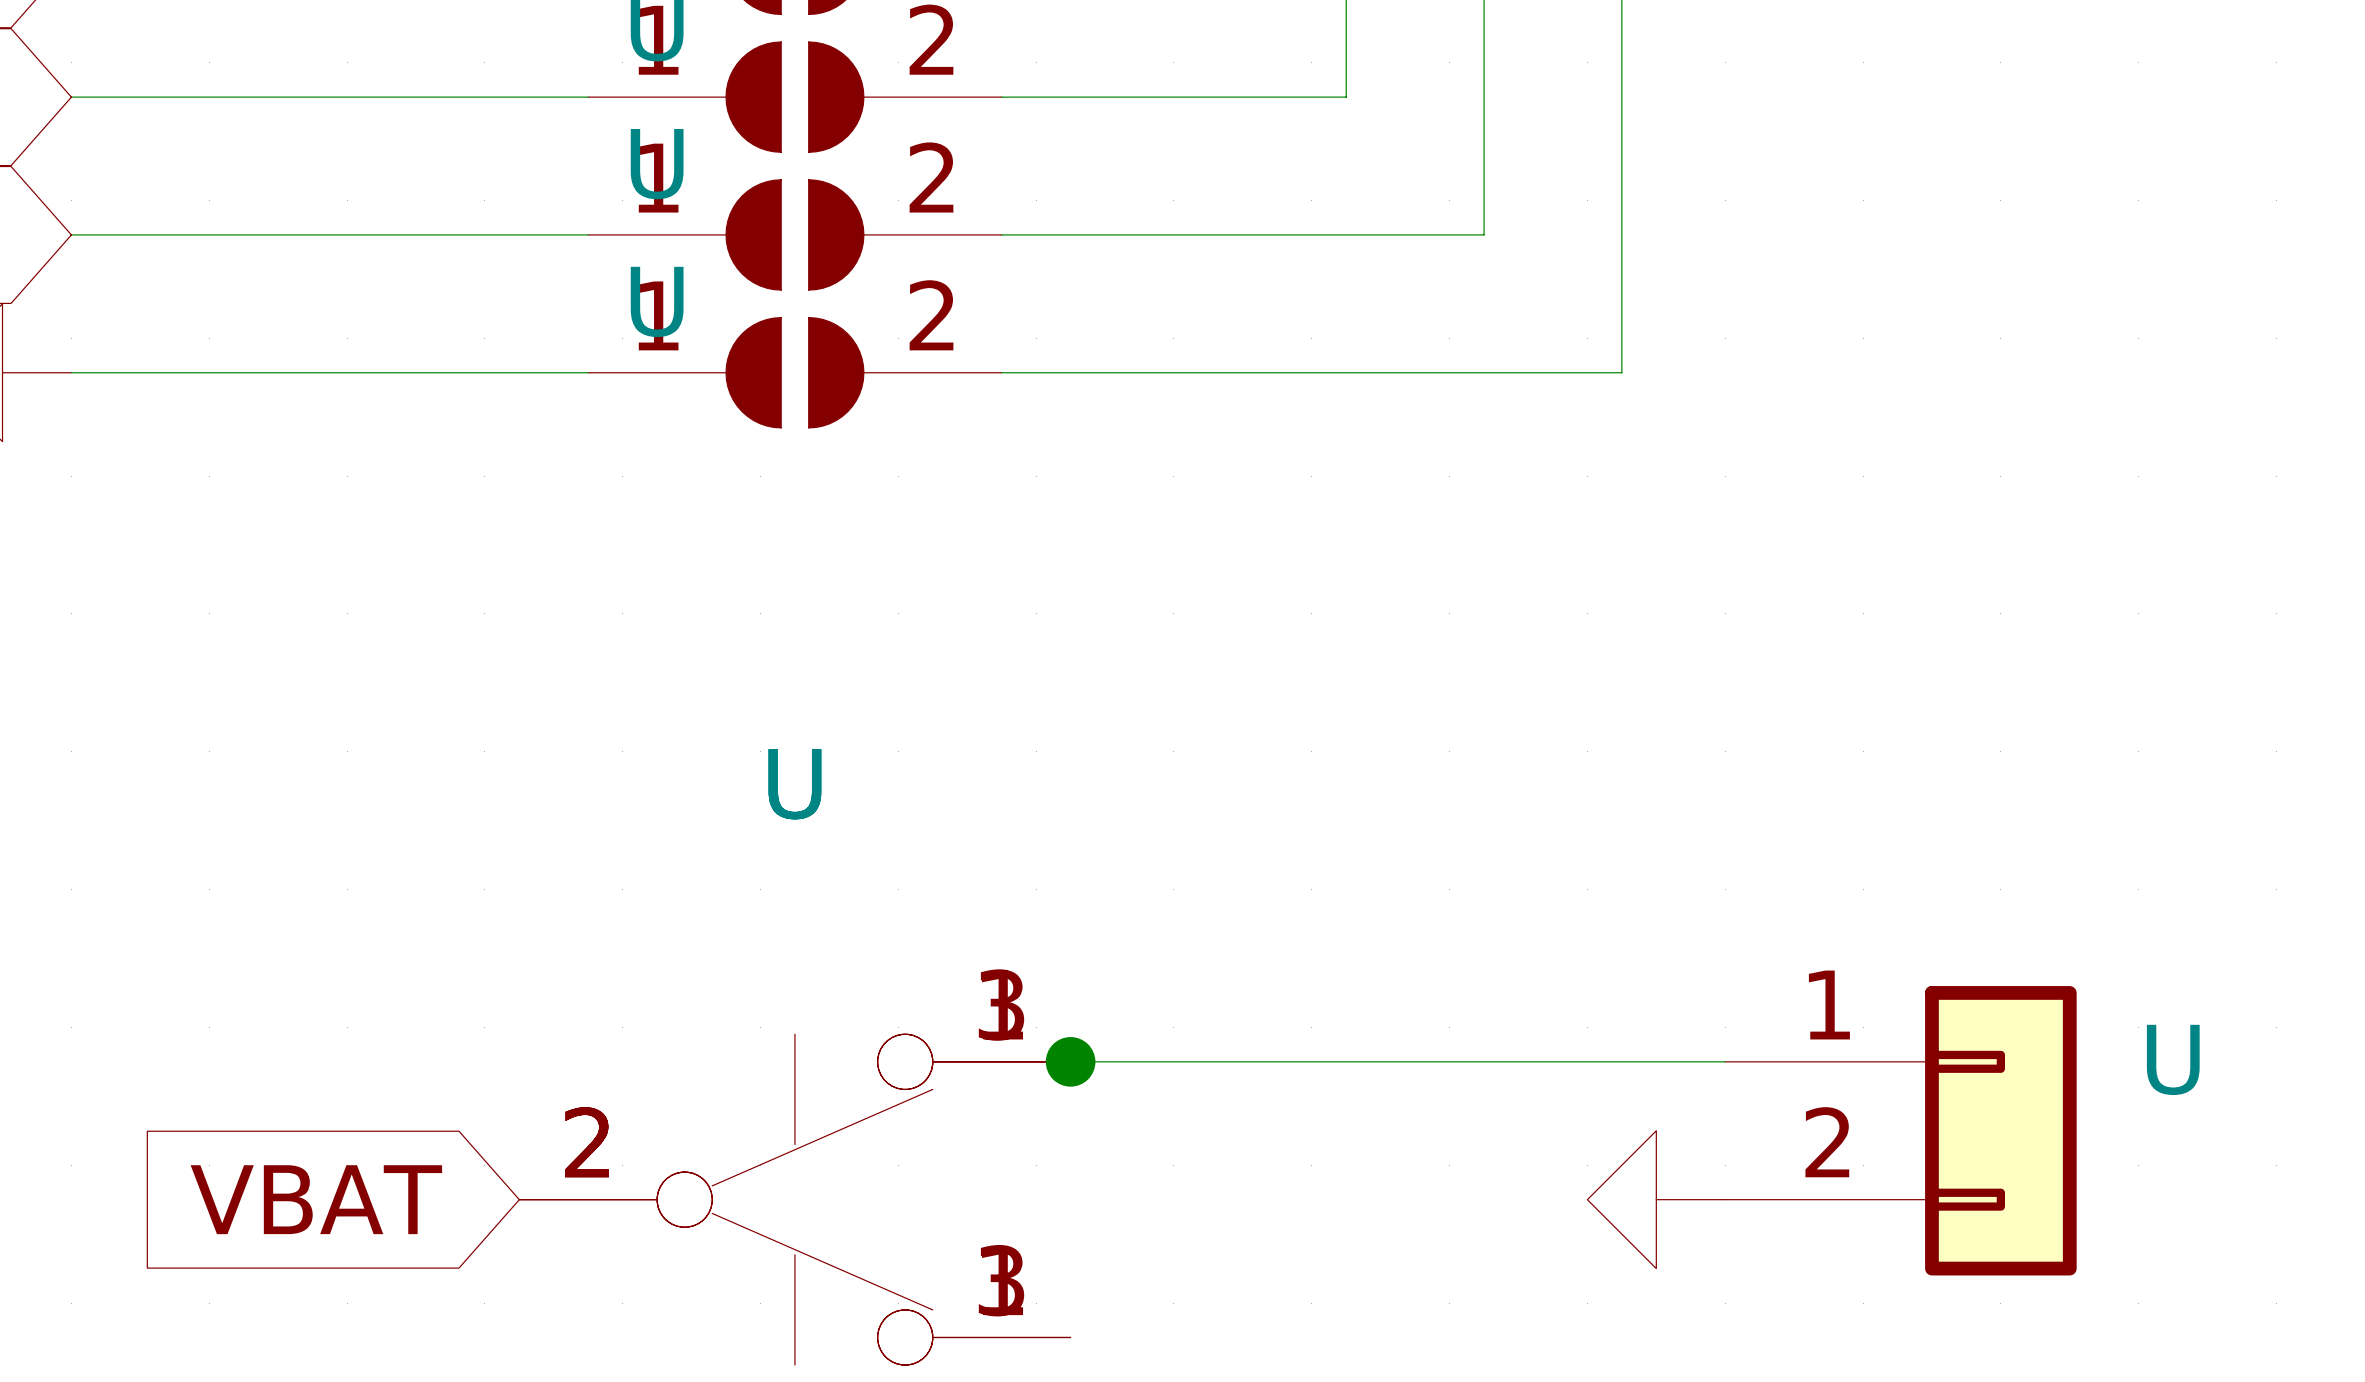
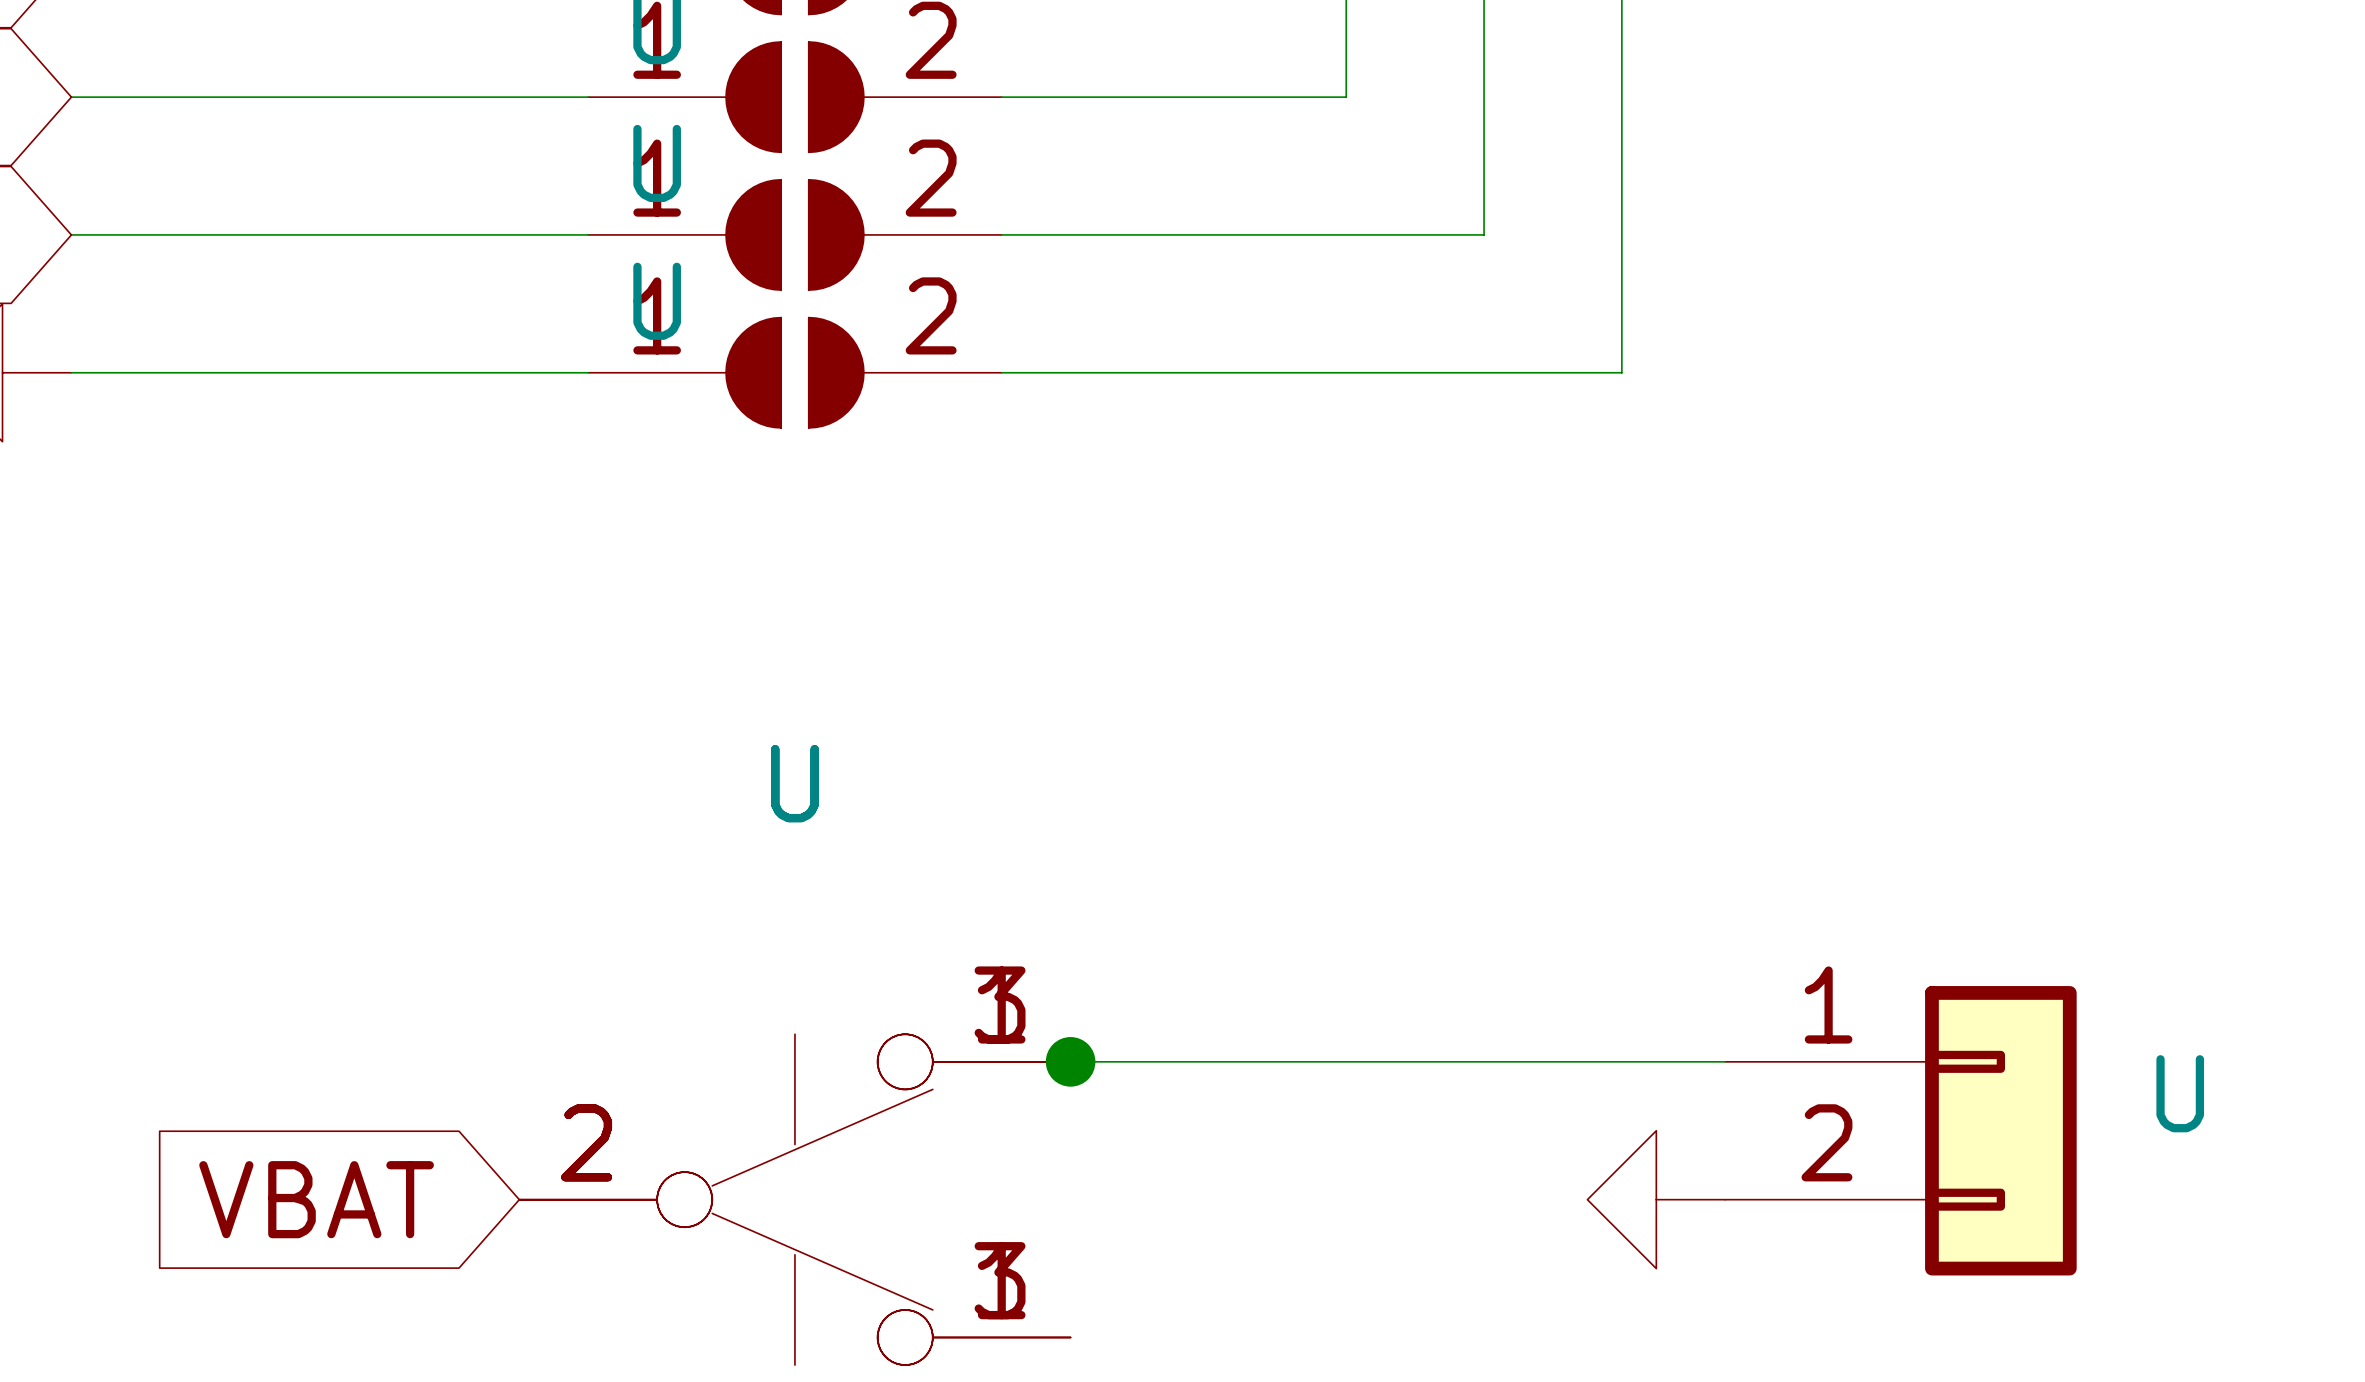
U name position: U (2173, 1059) -> U (2180, 1093)

